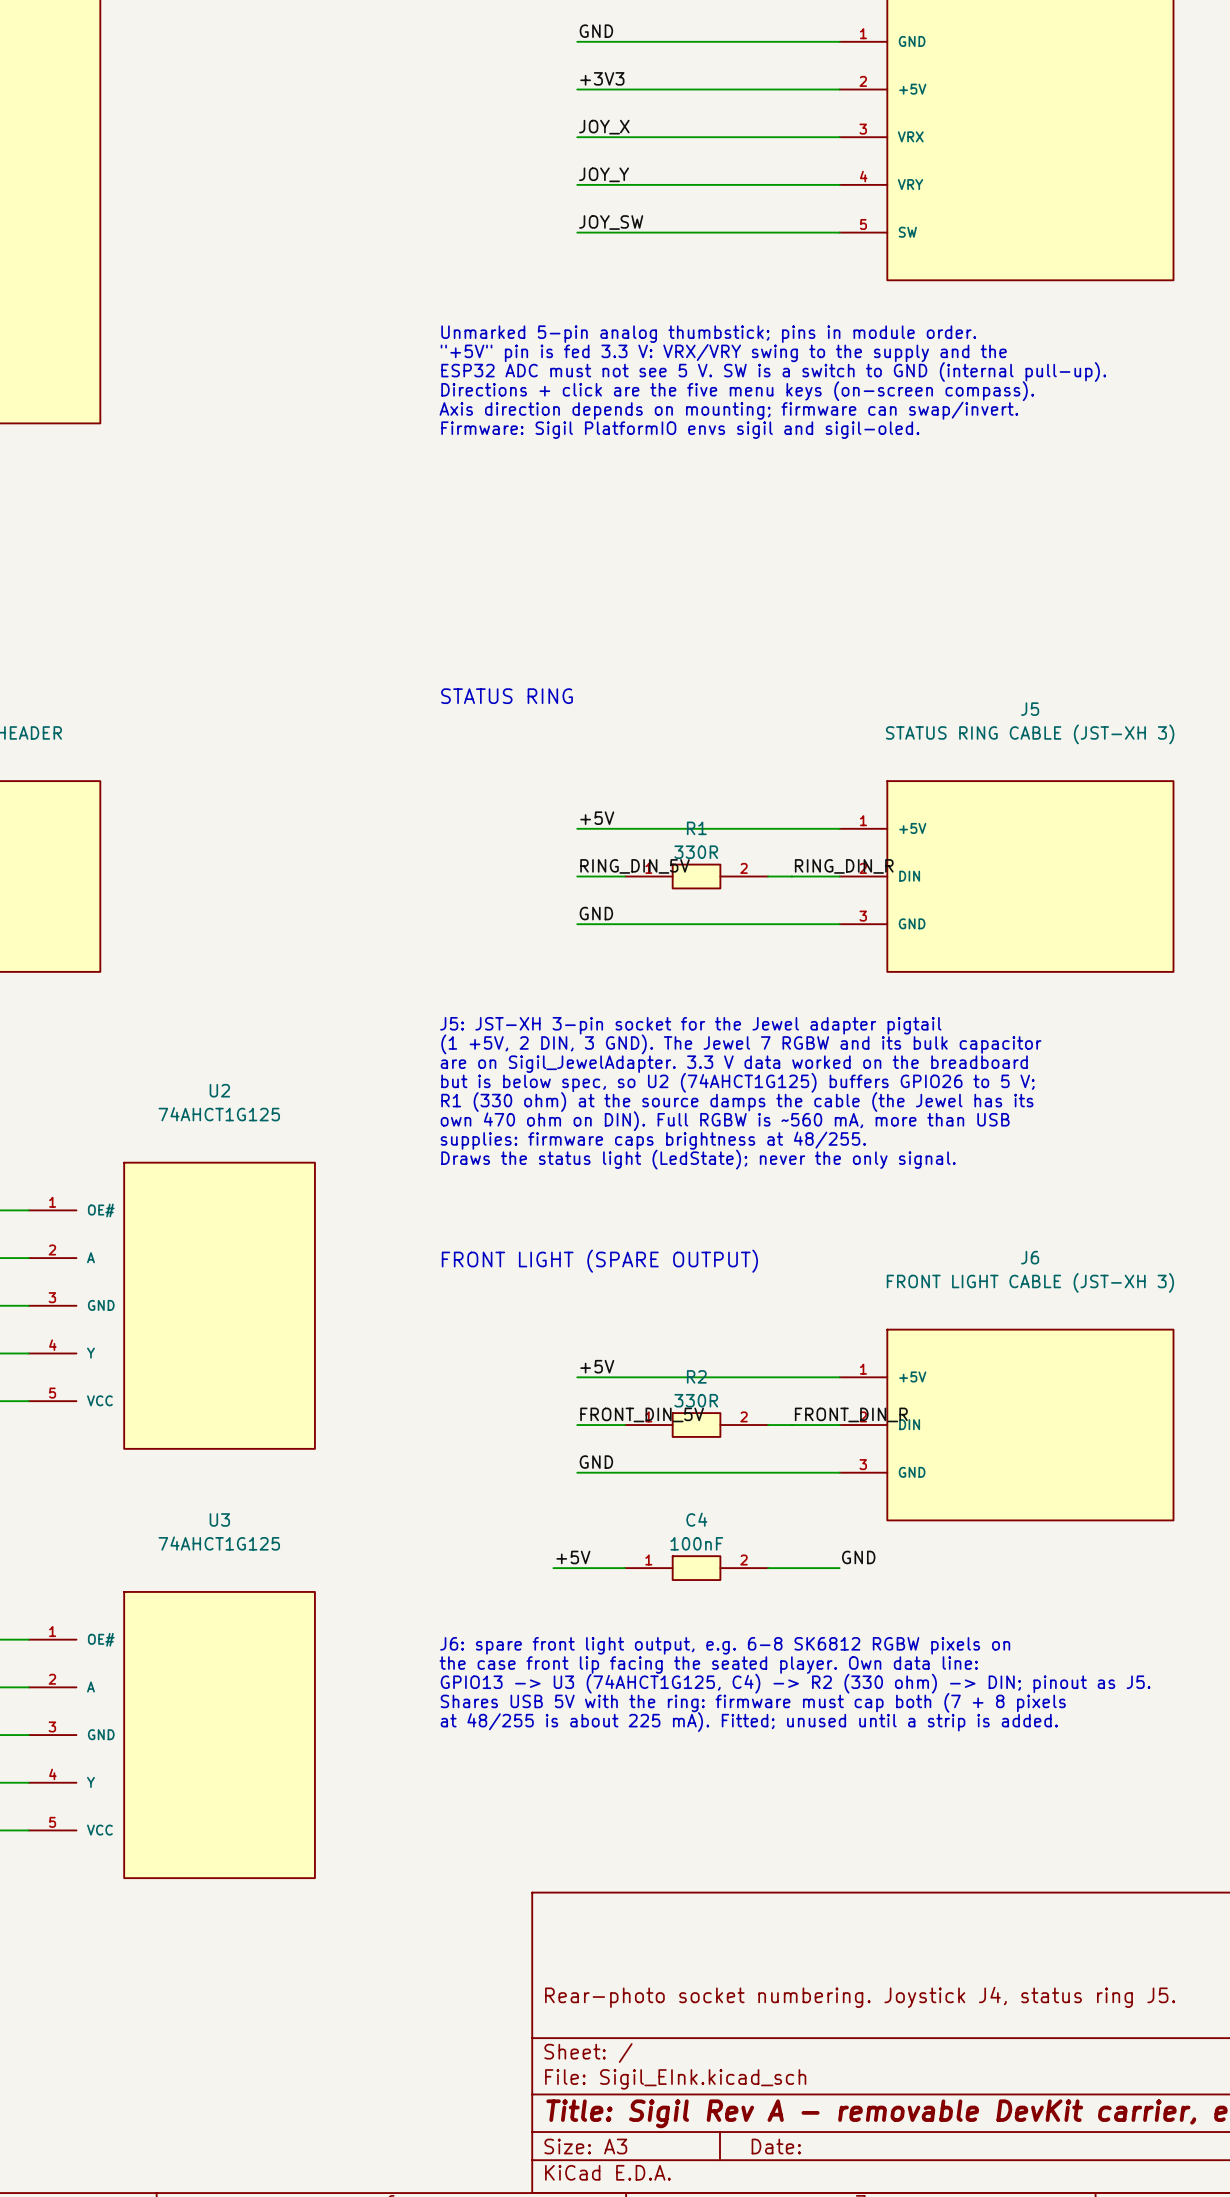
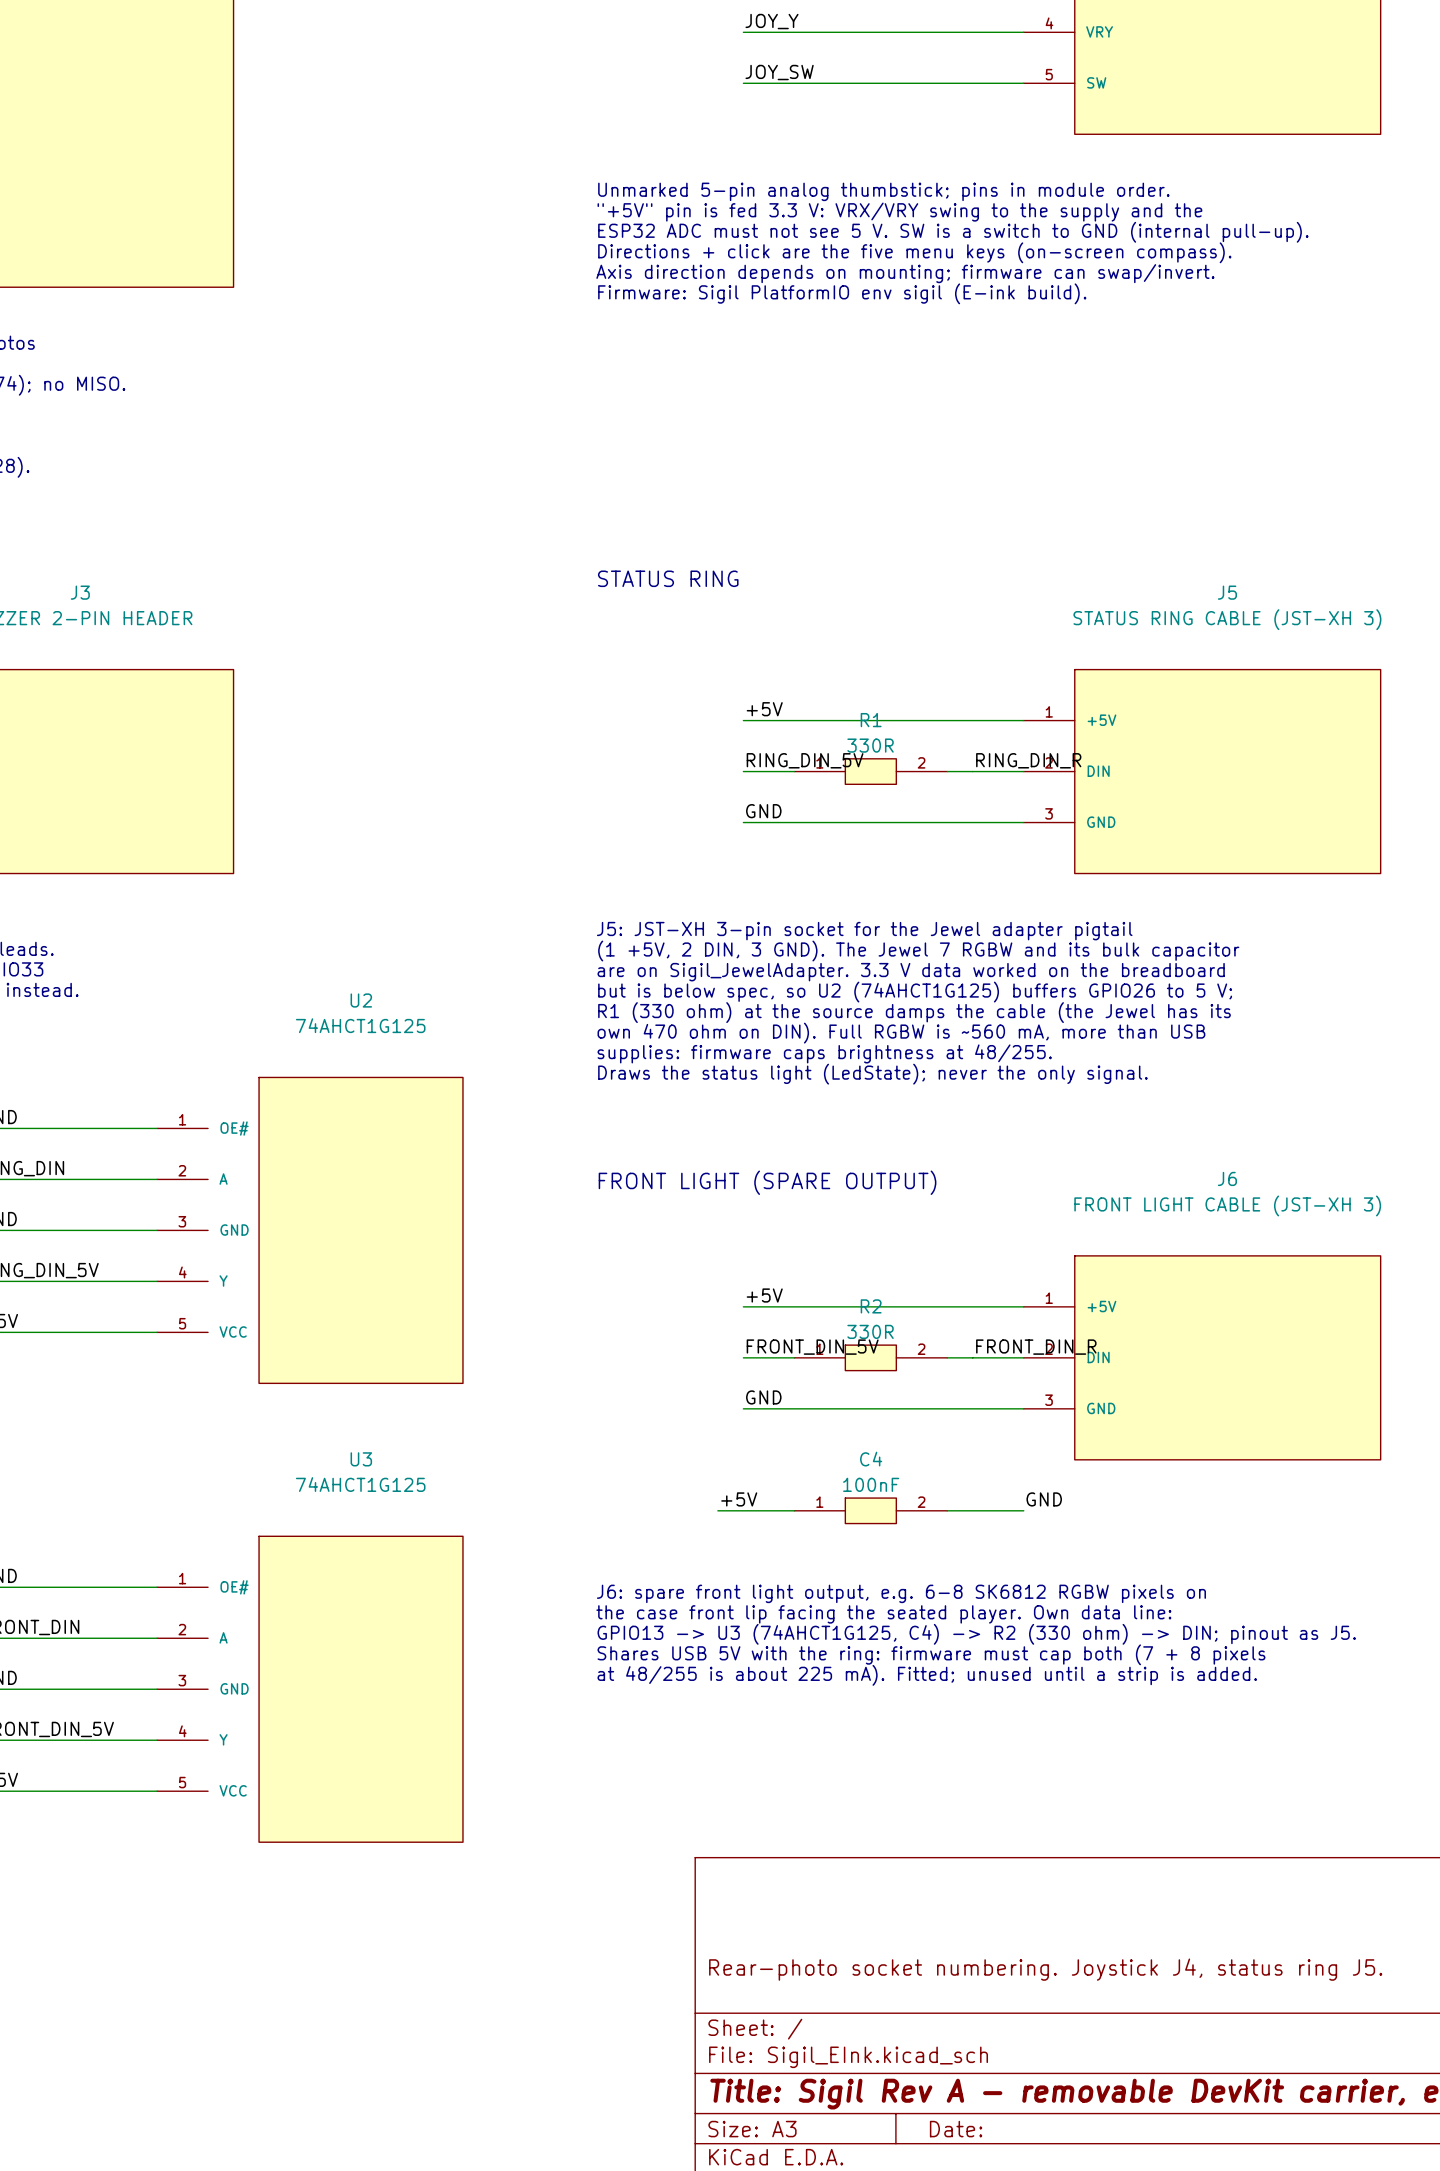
text: Firmware: Sigil PlatformIO envs sigil and sigil-oled. (680, 430) -> Firmware: Sigil PlatformIO env sigil (E-ink build). (842, 293)

